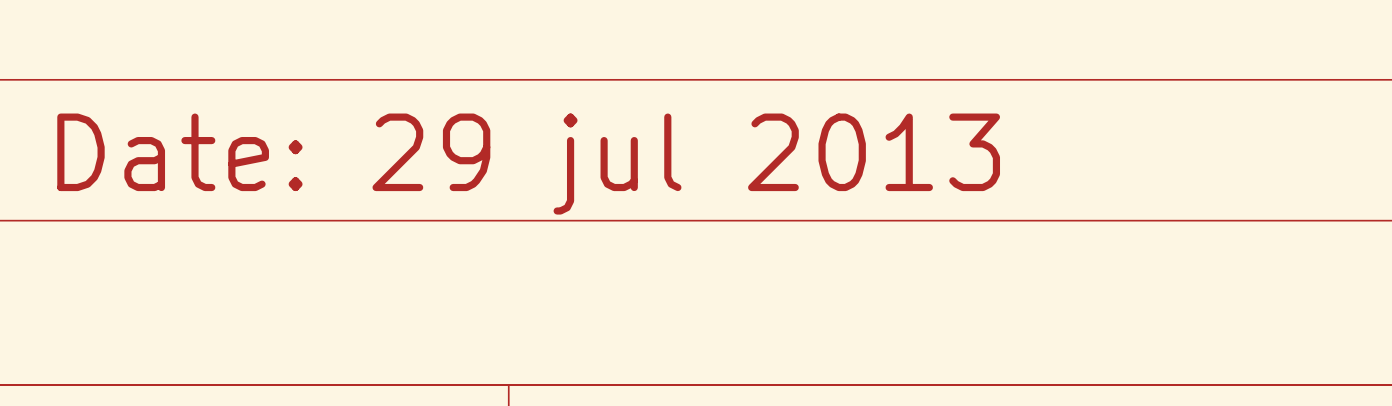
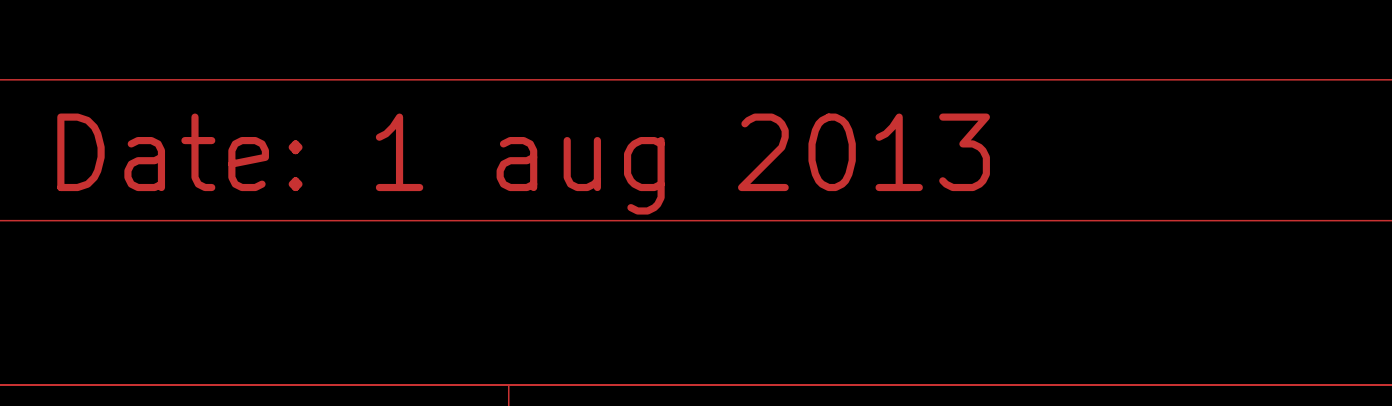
title block: Date: 29 jul 2013 (528, 164) -> Date: 1 aug 2013 (523, 164)

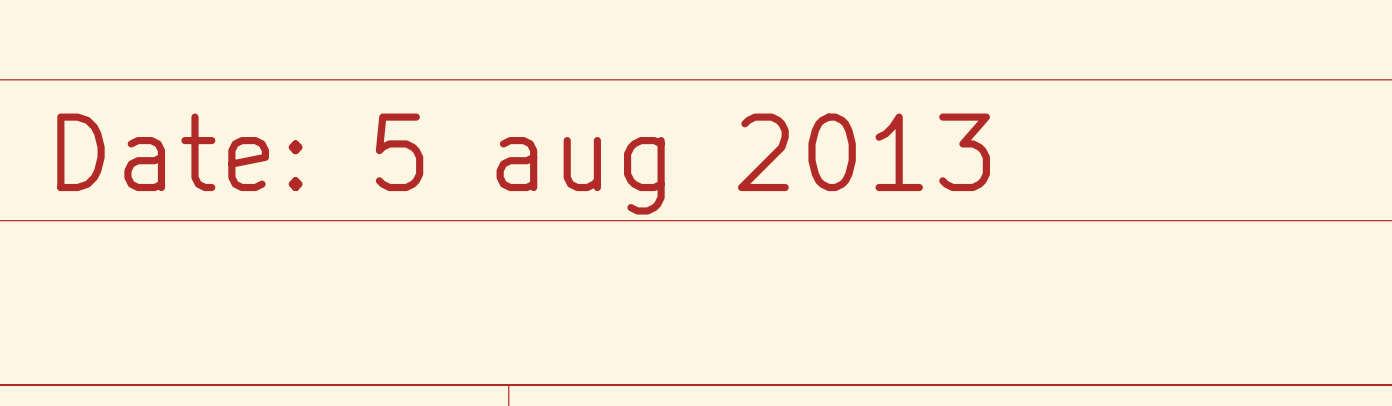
title block: Date: 1 aug 2013 (523, 164) -> Date: 5 aug 2013 (523, 164)

